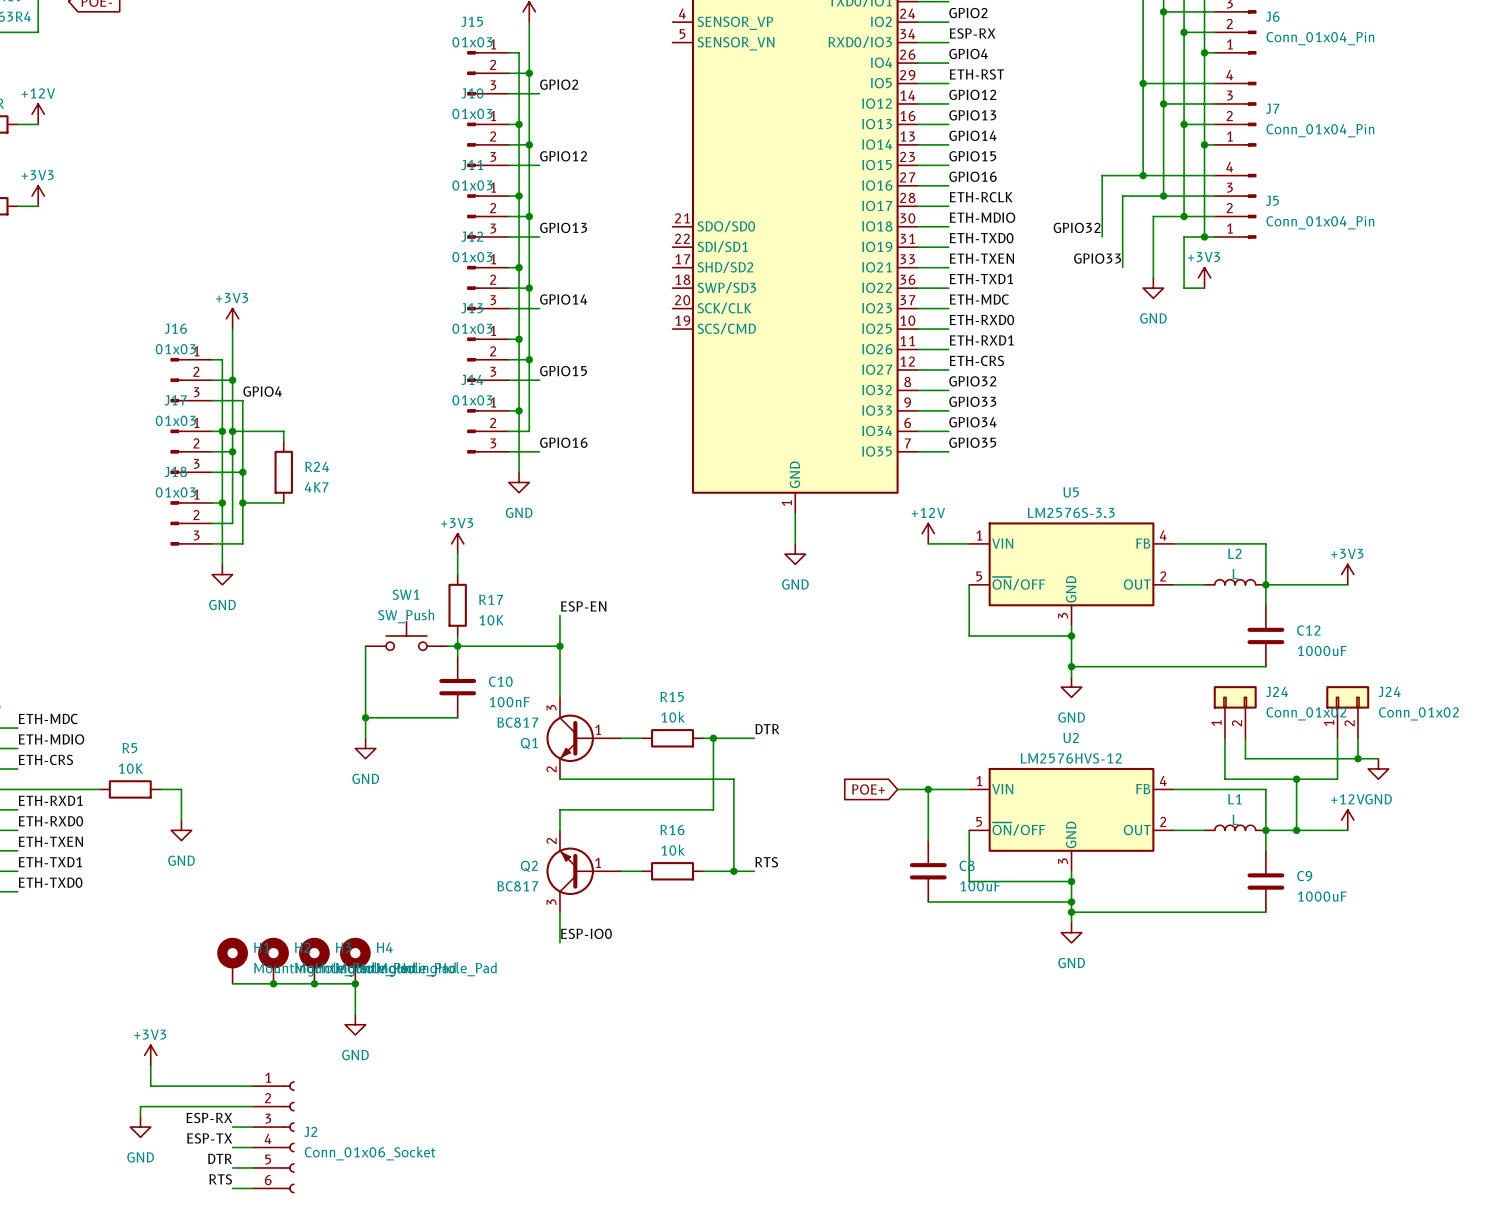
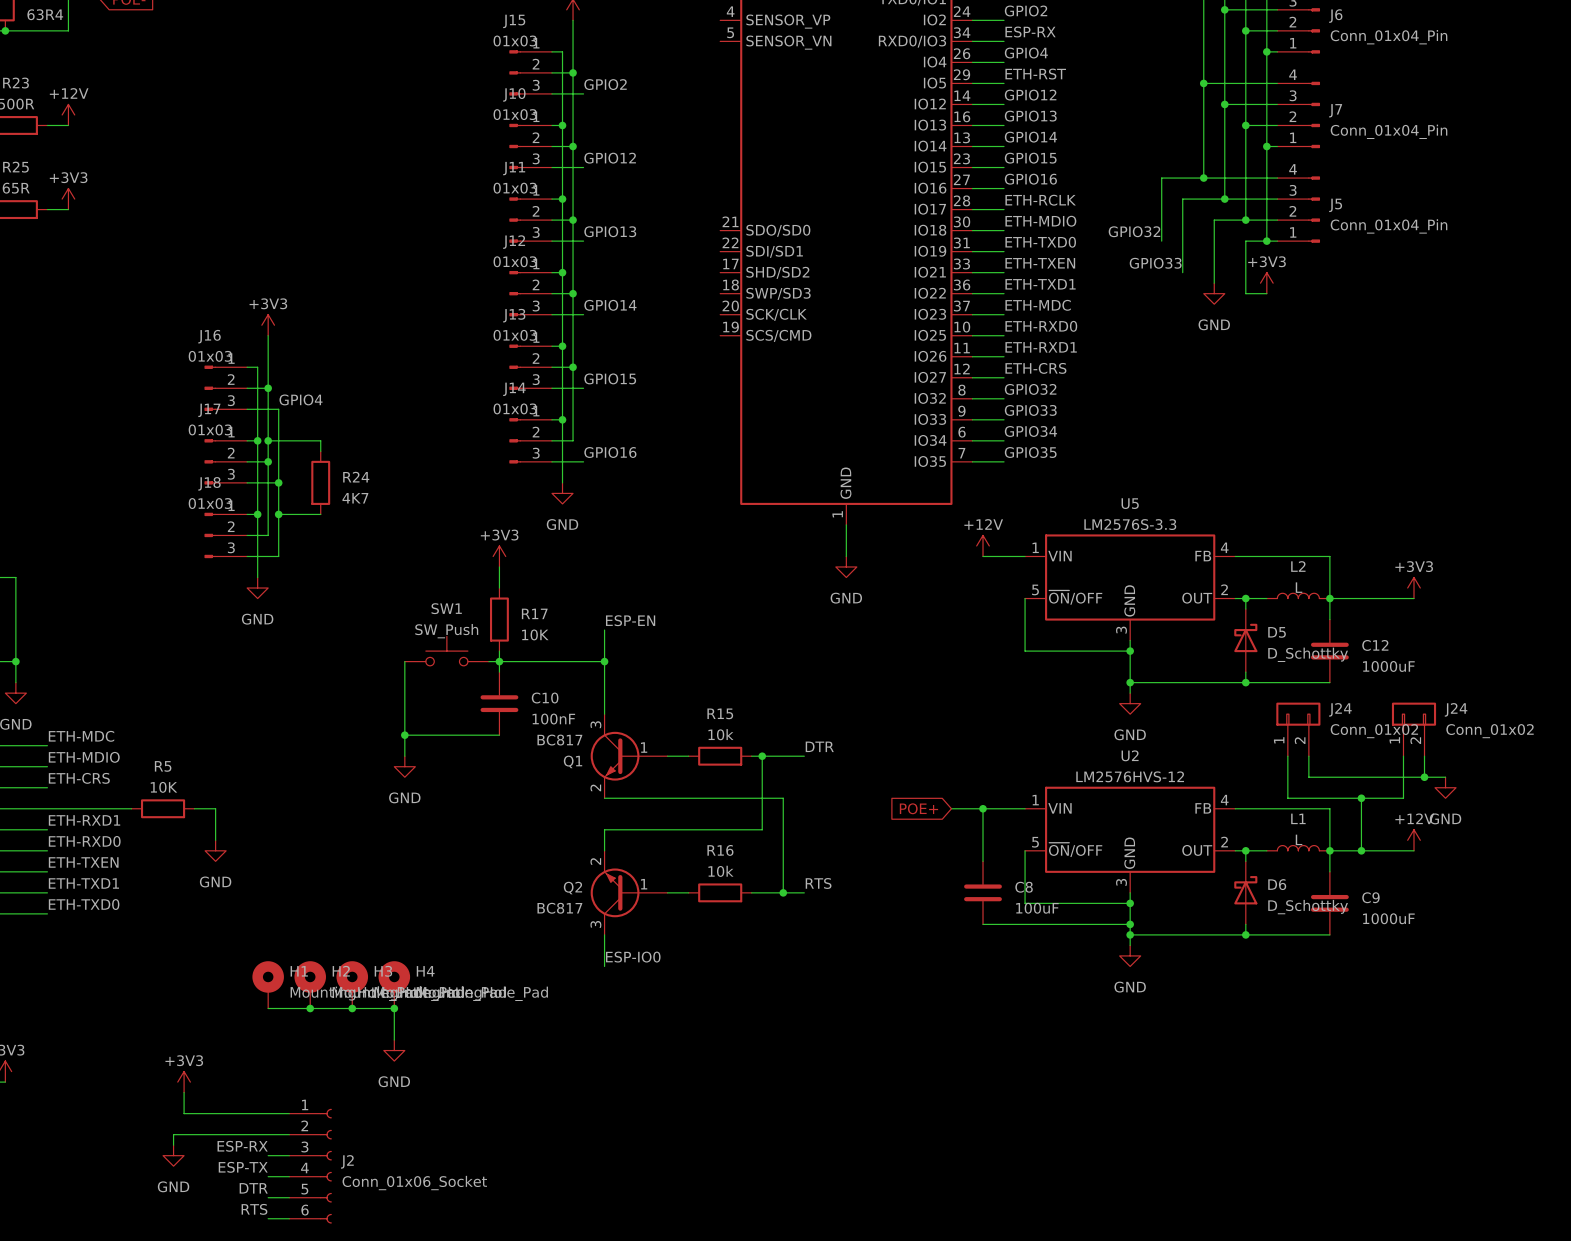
wire: none -> (1245, 598) (1245, 609)
junction: none -> (1245, 598)
D5: none -> D_Schottky (1245, 640)
wire: none -> (1245, 672) (1245, 682)
junction: none -> (1245, 682)
wire: none -> (1245, 850) (1245, 861)
junction: none -> (1245, 850)
D6: none -> D_Schottky (1245, 892)
wire: none -> (1245, 924) (1245, 934)
junction: none -> (1245, 934)

